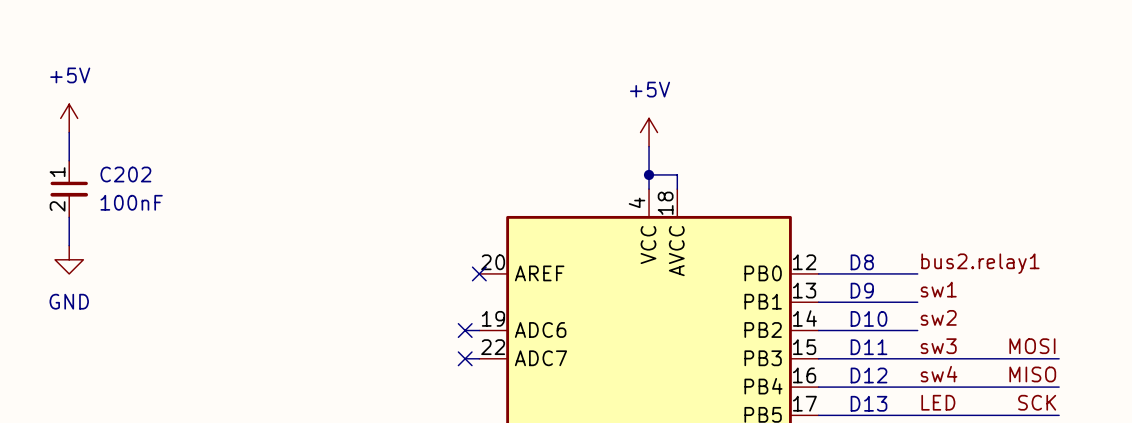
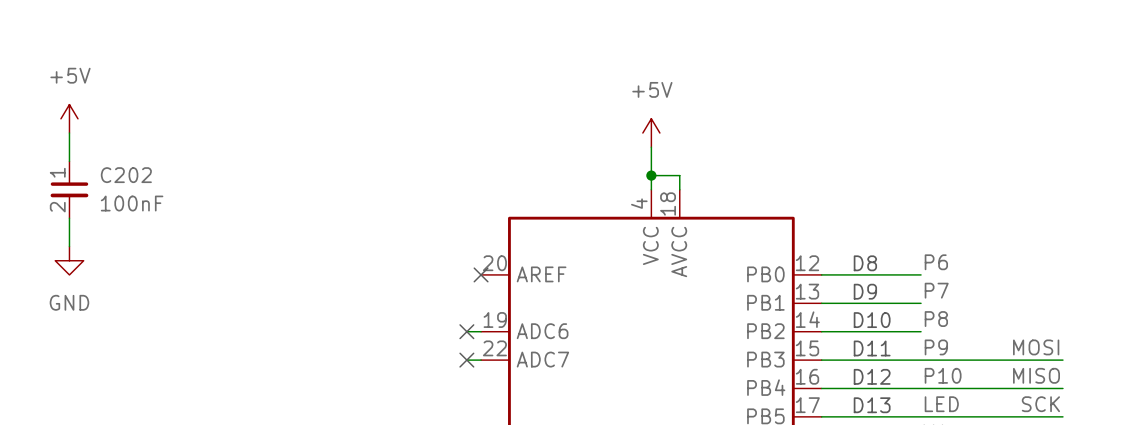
label: bus2.relay1 (980, 263) -> P6 (936, 262)
label: sw1 (938, 289) -> P7 (936, 290)
label: sw2 (938, 317) -> P8 (936, 319)
label: sw3 (938, 346) -> P9 (936, 347)
label: sw4 (939, 374) -> P10 (943, 375)

